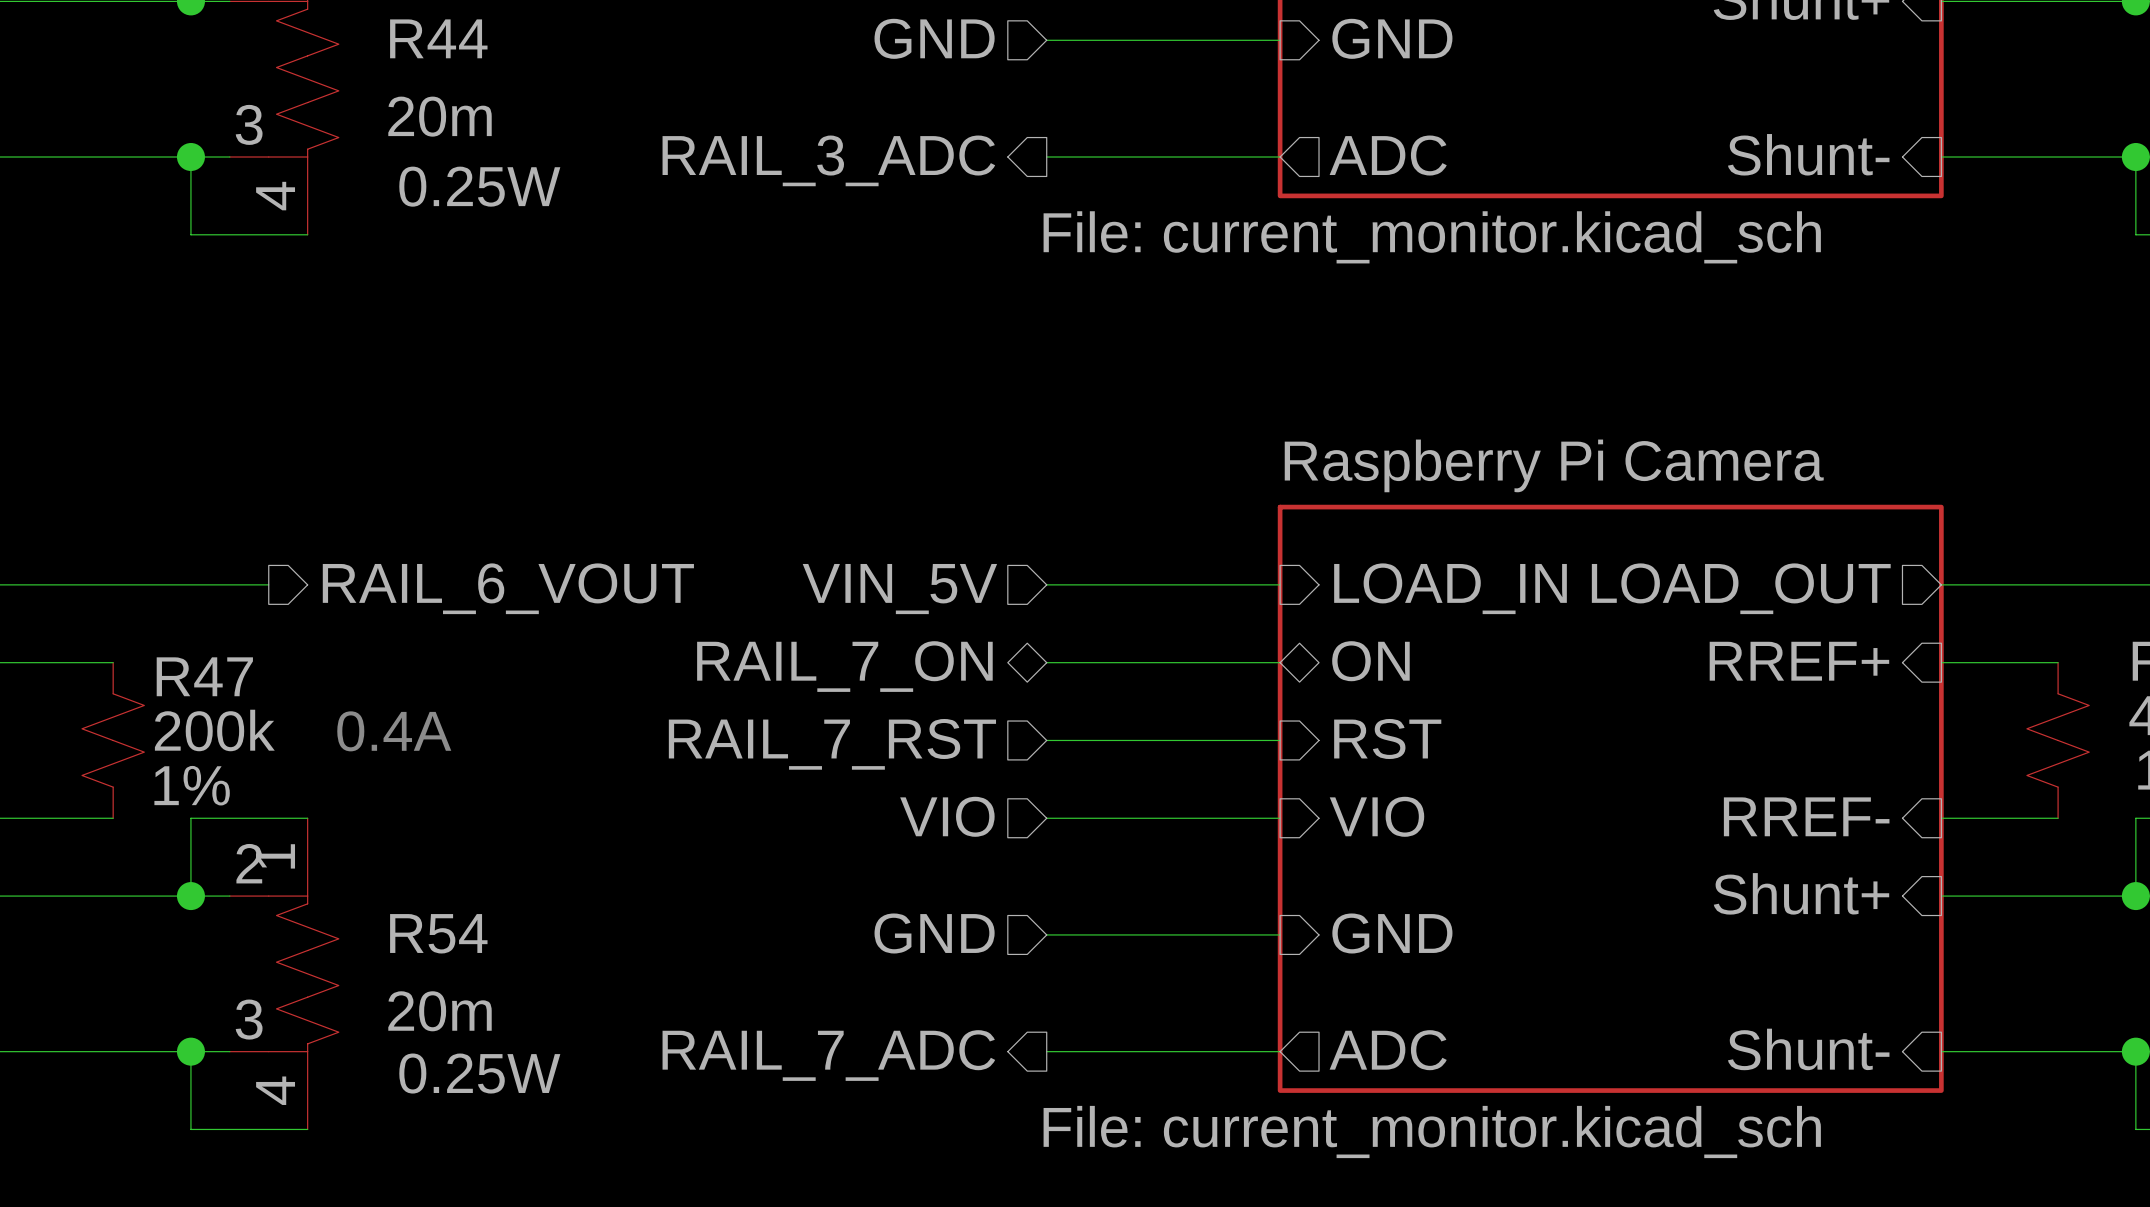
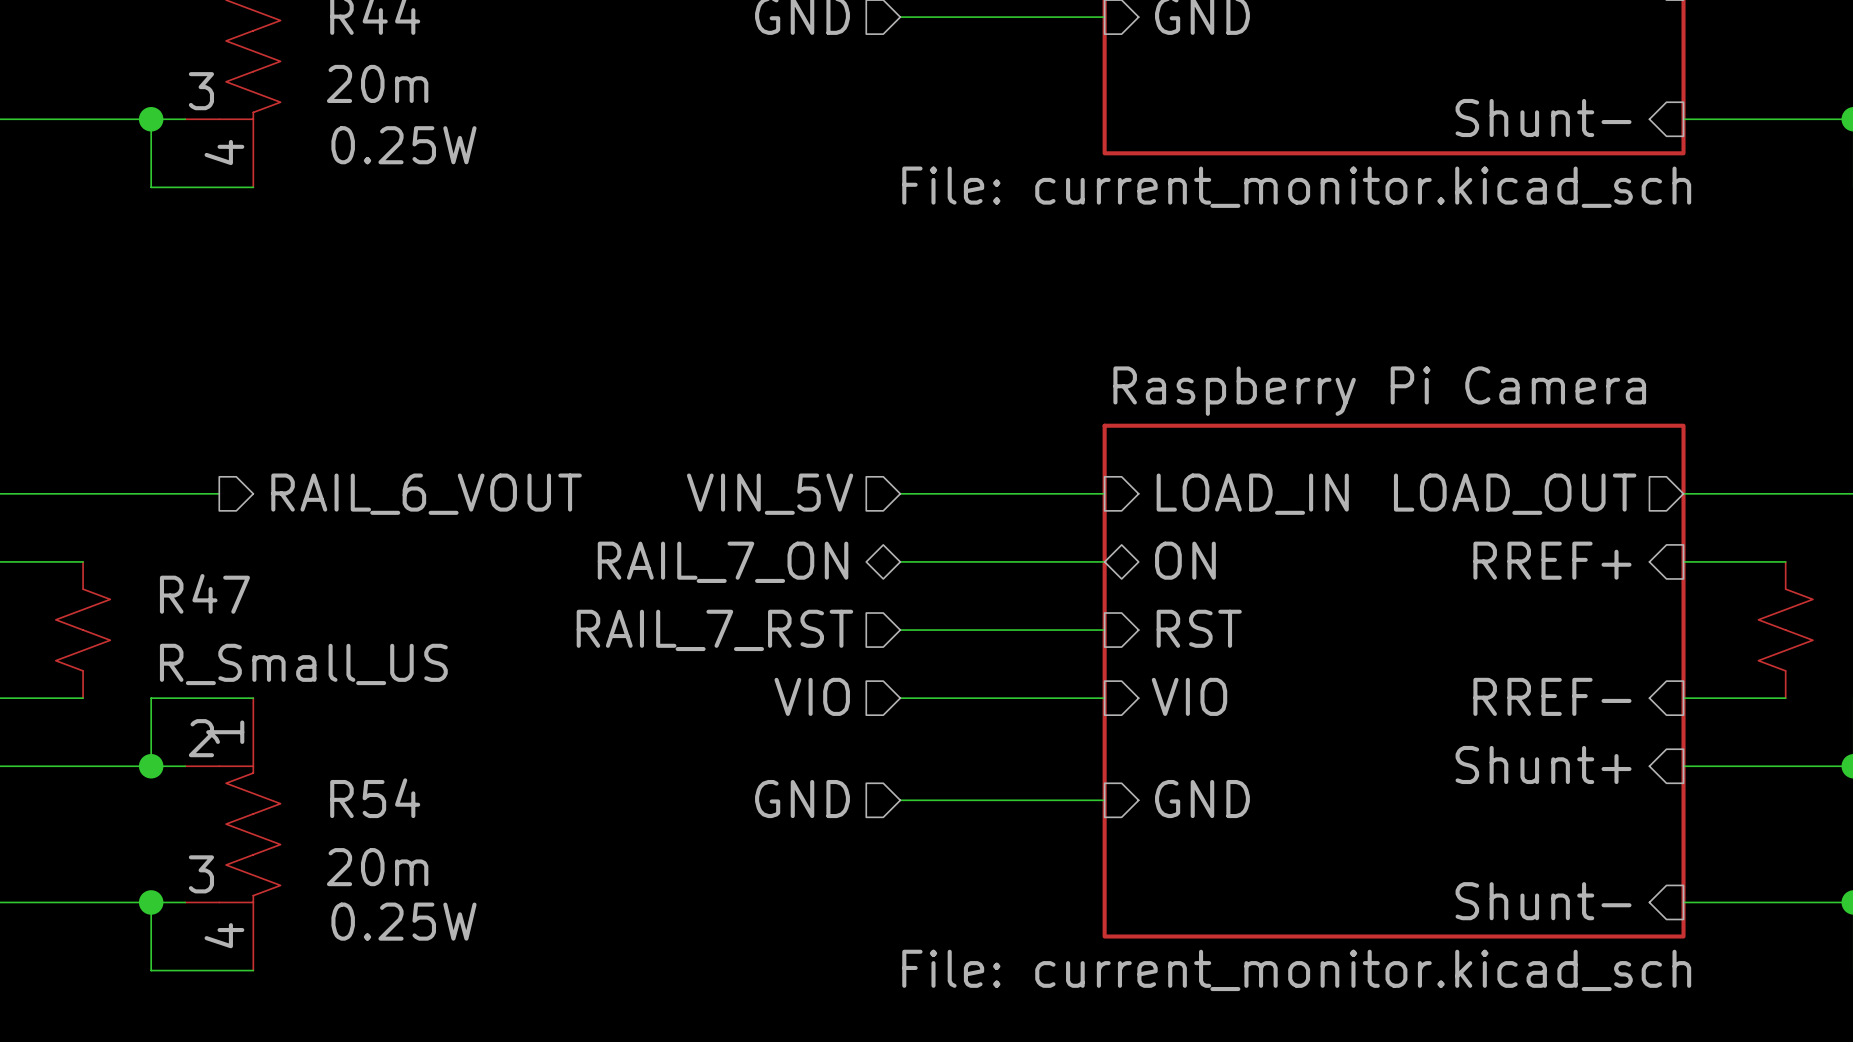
sheet pin: ADC (1388, 155) -> none
wire: (1046, 157) (1280, 157) -> none
hierarchical label: RAIL_3_ADC (828, 160) -> none
R47 name position: R47 (204, 676) -> R47 (204, 593)
R47 value: 200k (214, 730) -> R_Small_US (303, 664)
text: 0.4A (394, 731) -> none
R47 text: 1% (192, 785) -> none
sheet pin: ADC (1388, 1050) -> none
wire: (1046, 1051) (1280, 1051) -> none
hierarchical label: RAIL_7_ADC (828, 1055) -> none

